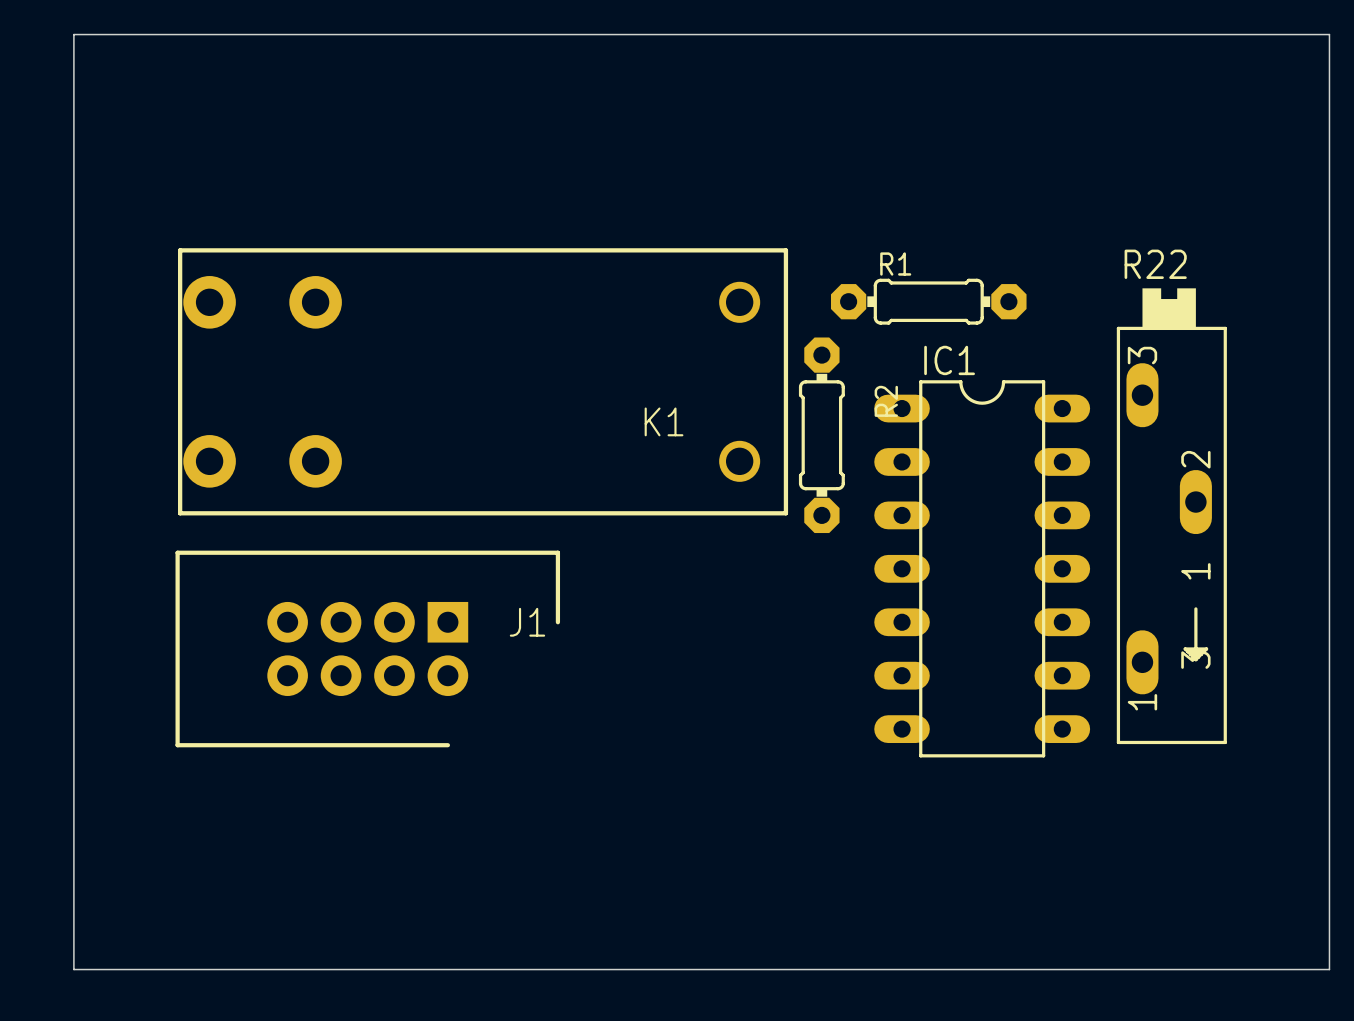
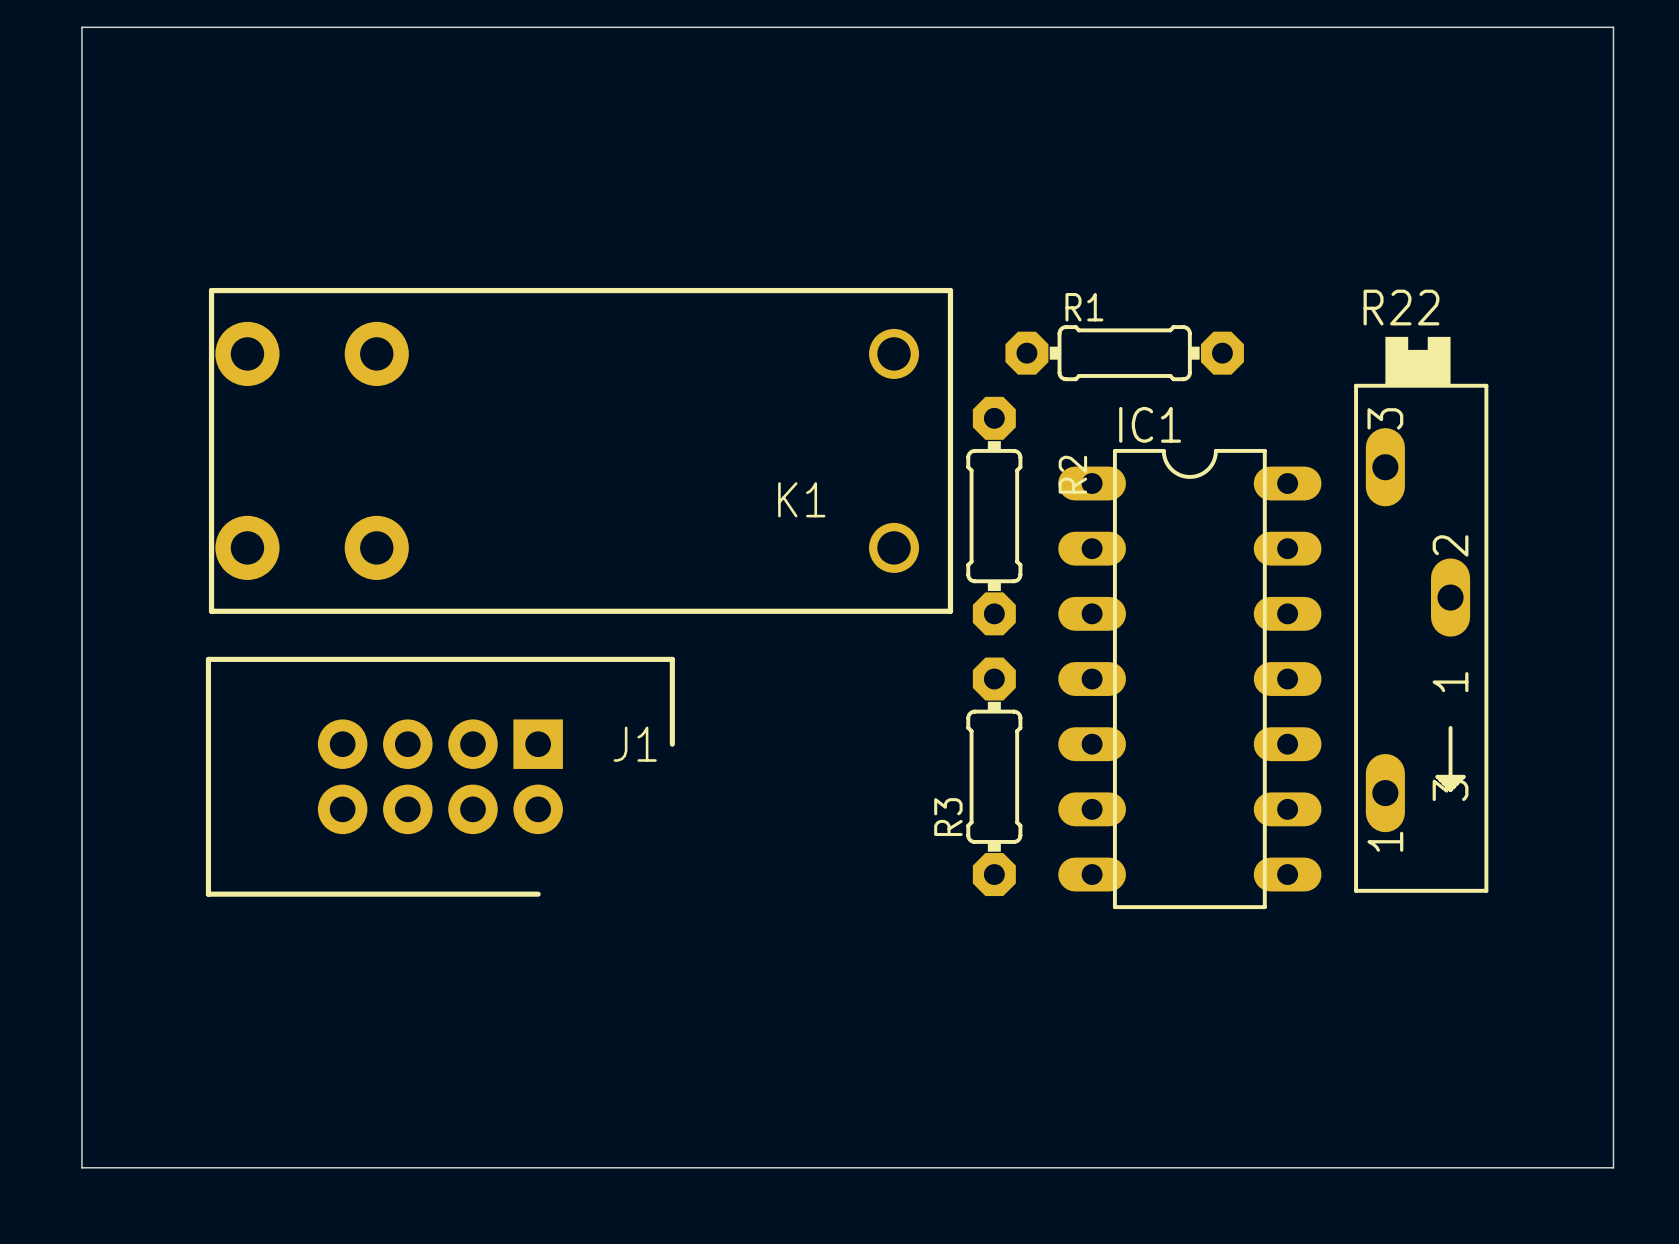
R3: none -> (994, 776)

